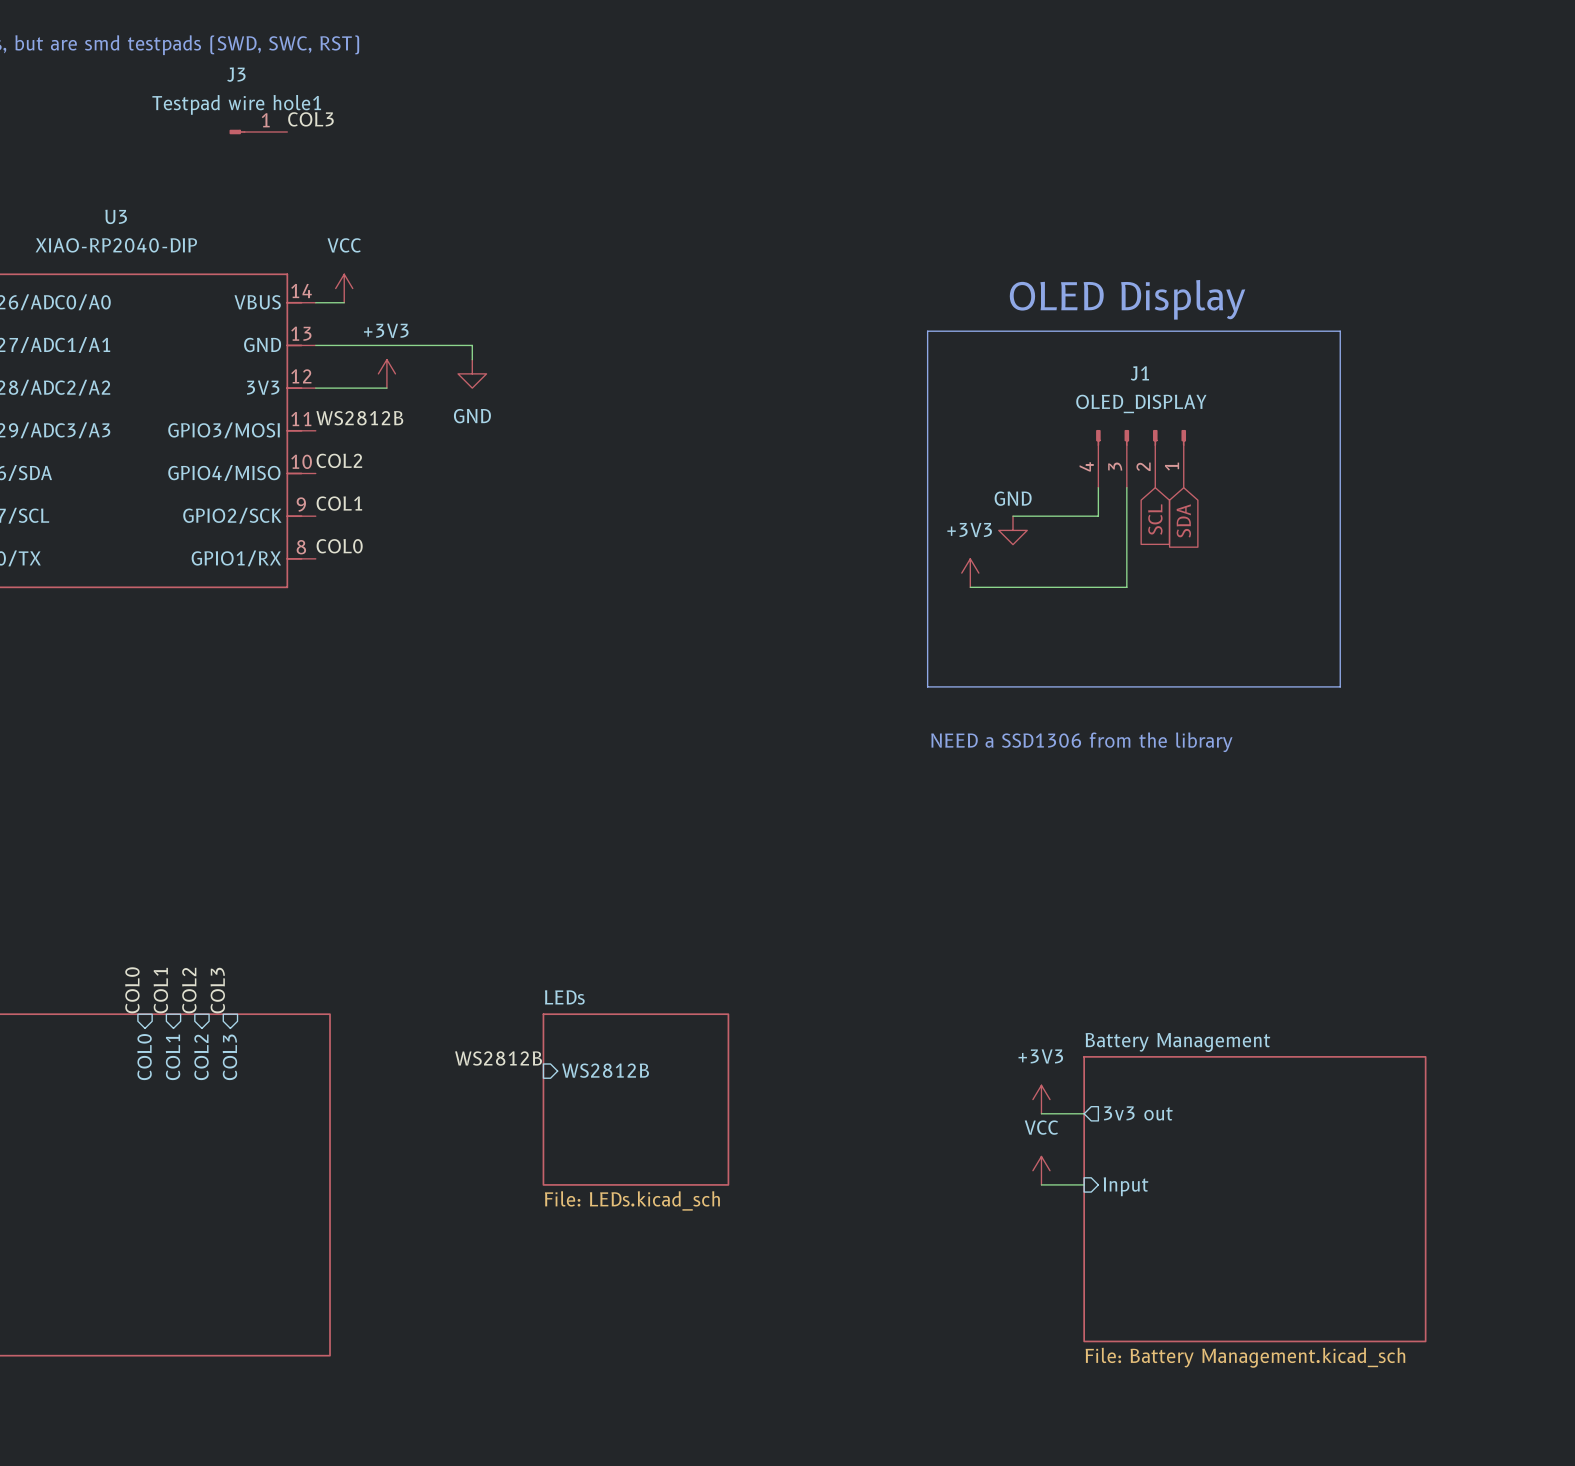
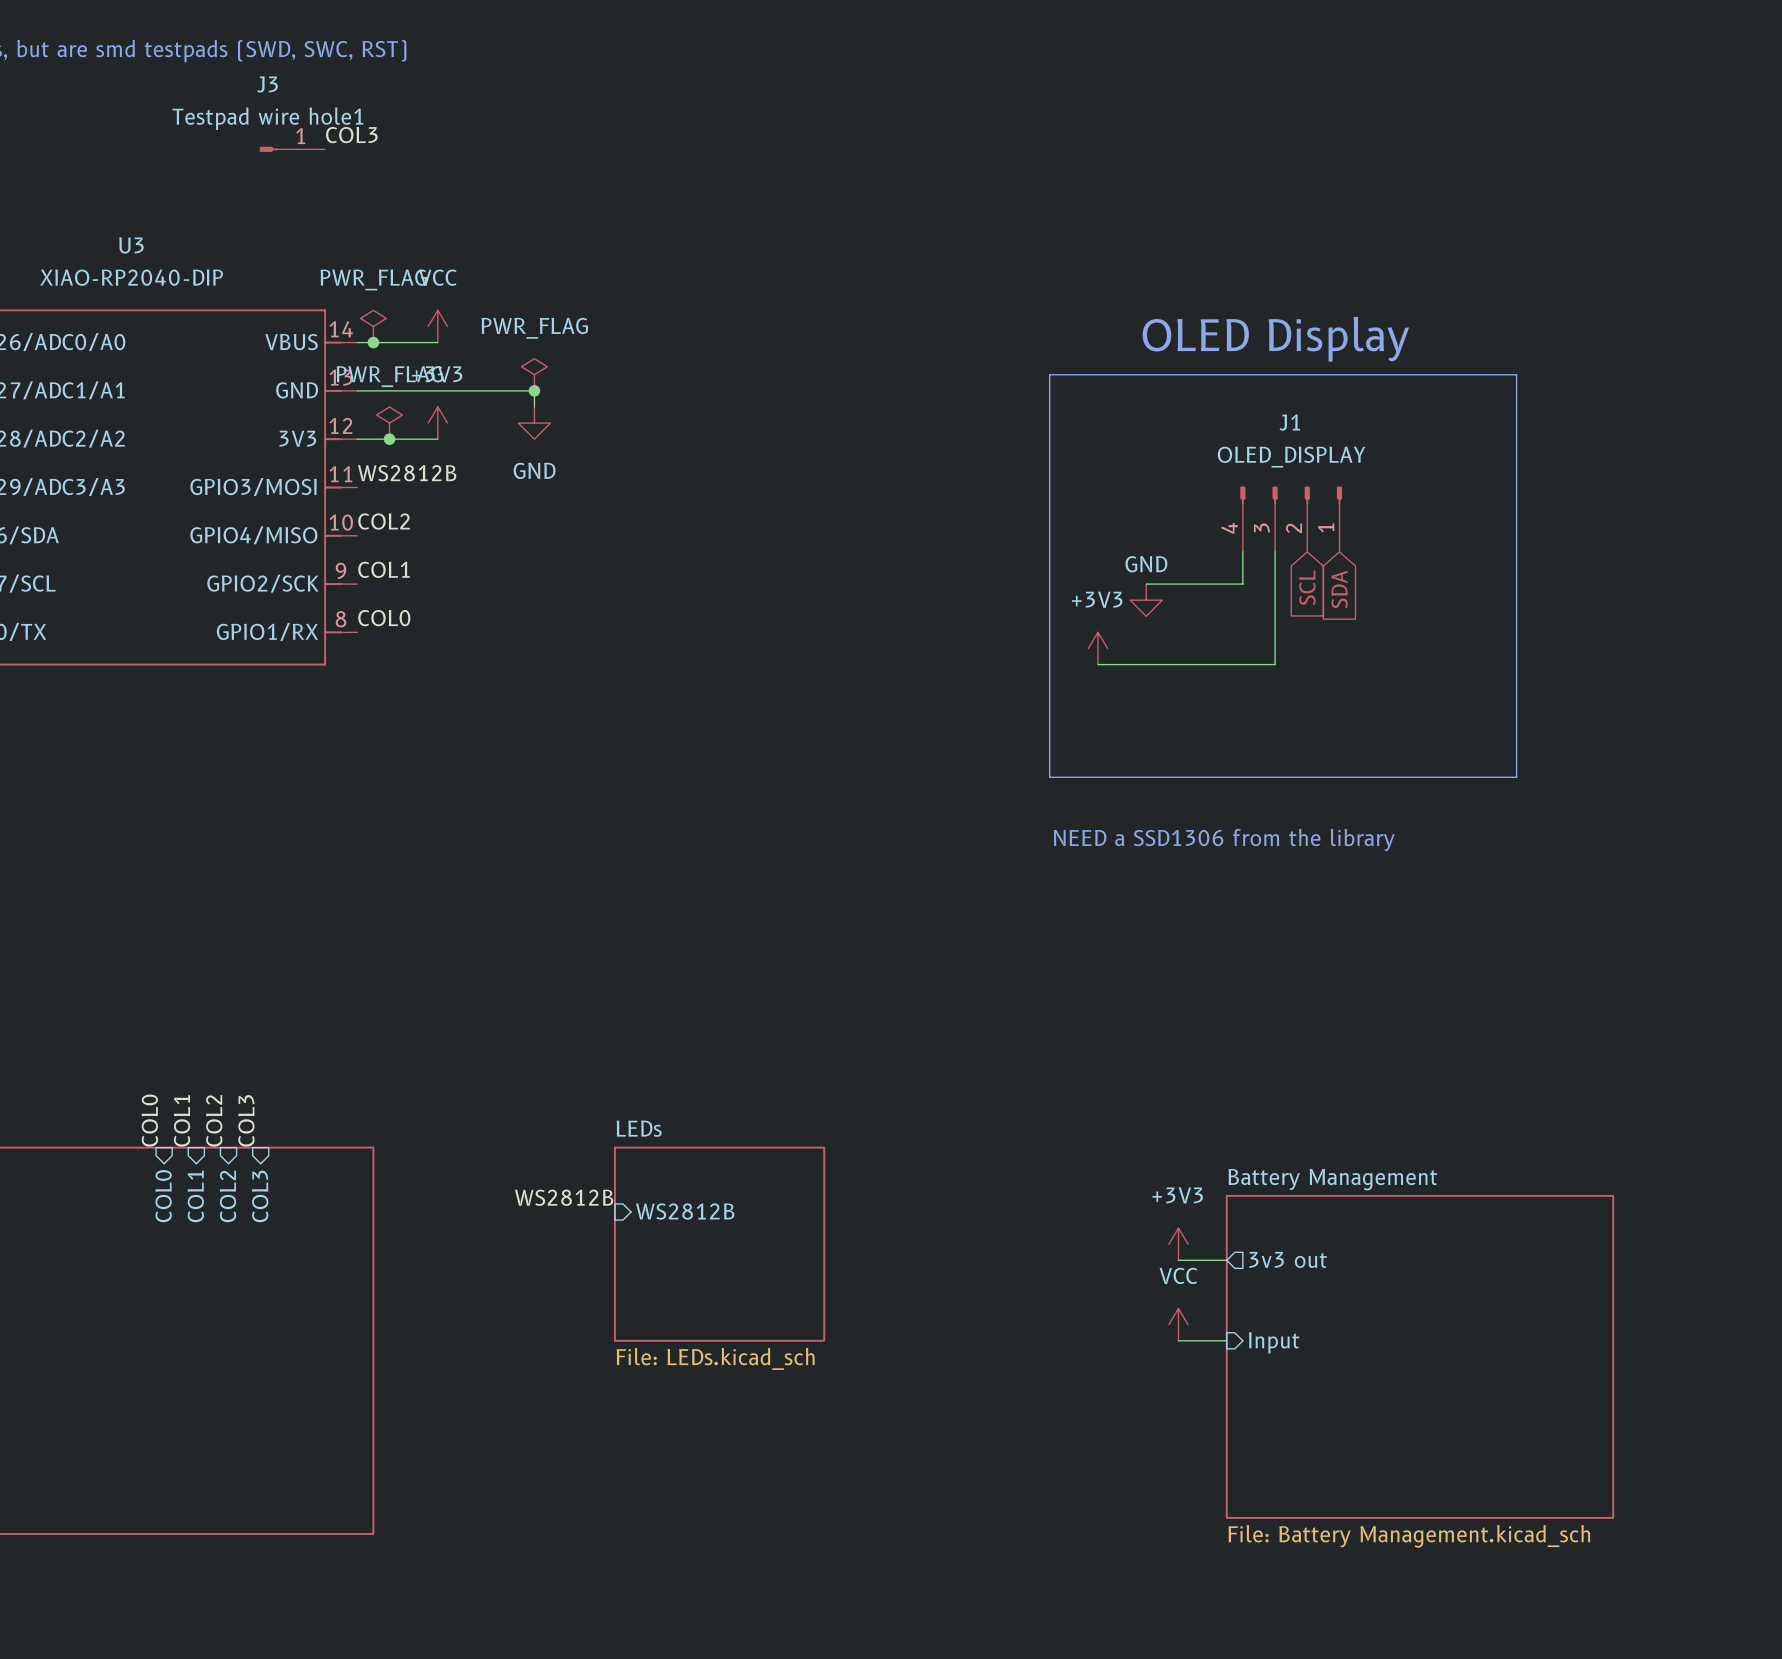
power symbol: none -> PWR_FLAG (373, 326)
power symbol position: VCC (344, 288) -> VCC (437, 326)
junction: none -> (373, 342)
wire: none -> (389, 342) (437, 342)
power symbol: none -> PWR_FLAG (534, 374)
junction: none -> (534, 390)
power symbol: none -> PWR_FLAG (389, 423)
junction: none -> (389, 439)

